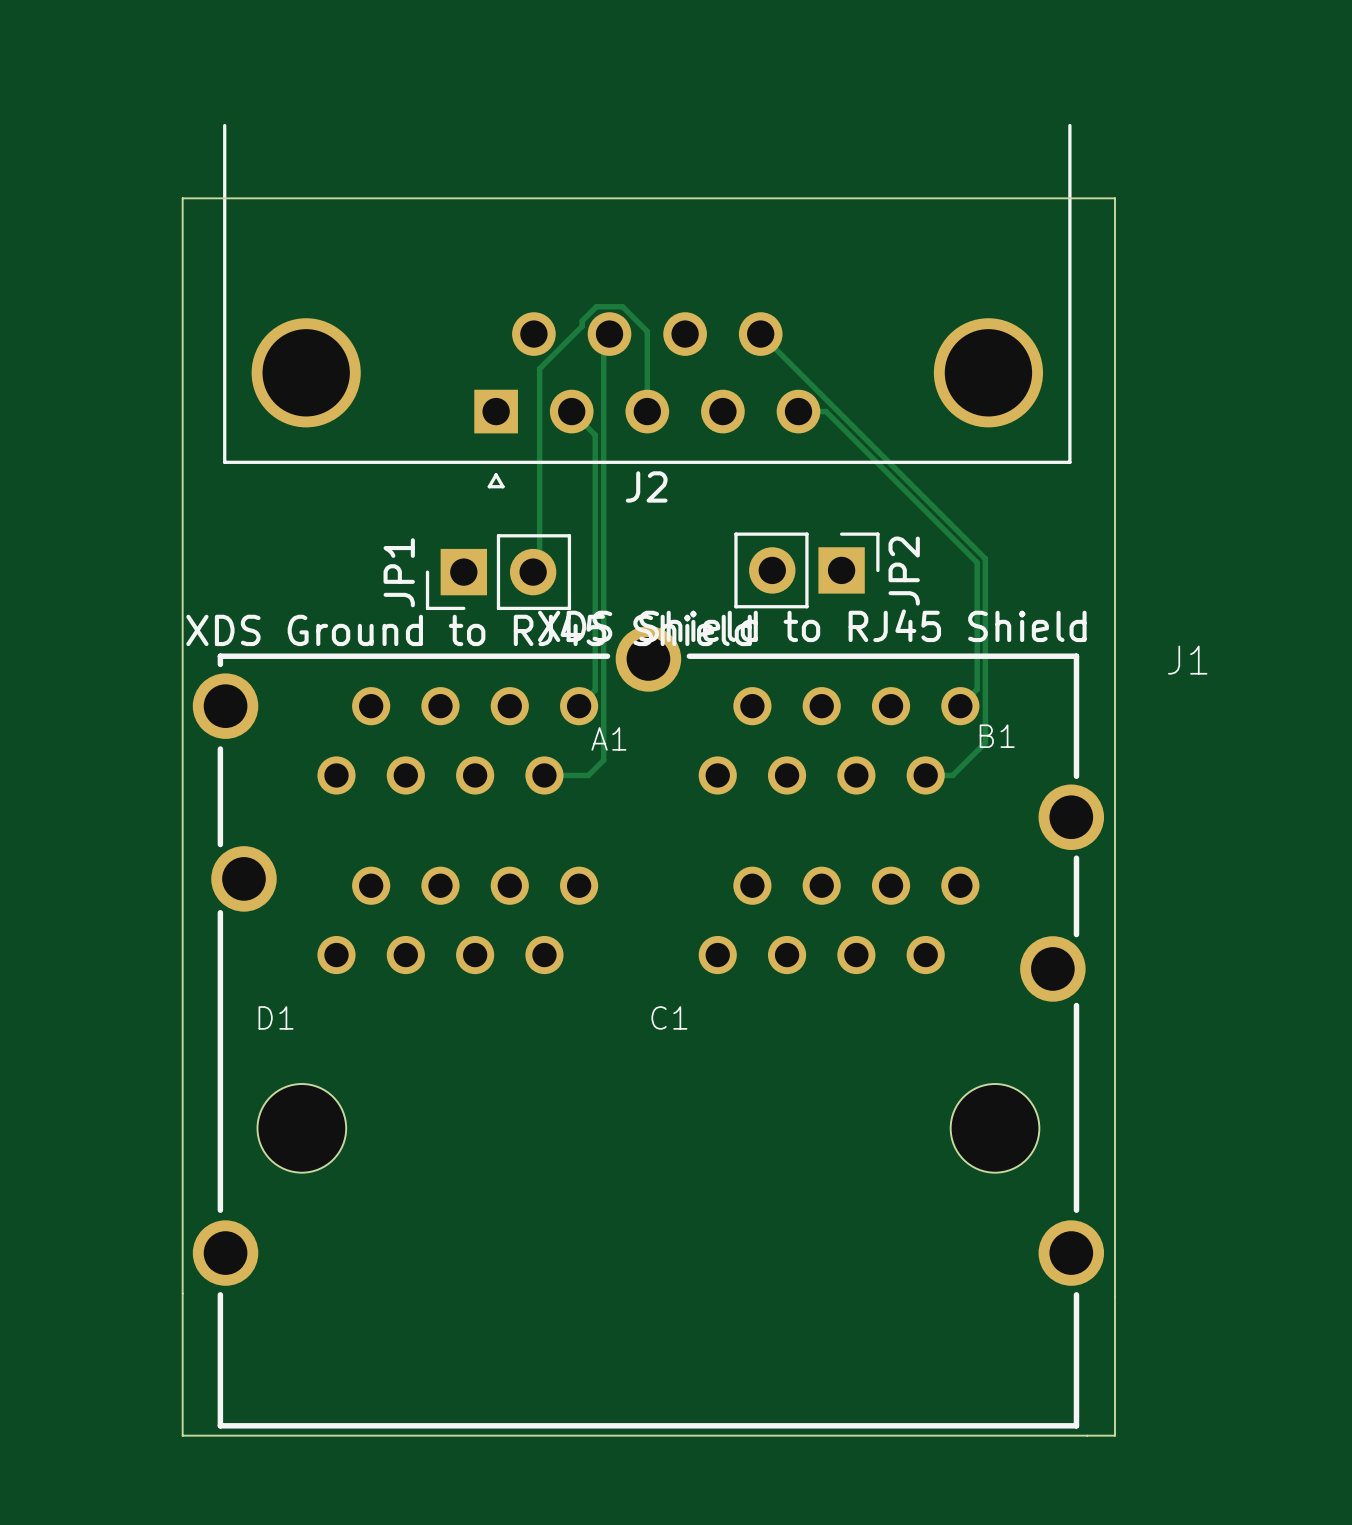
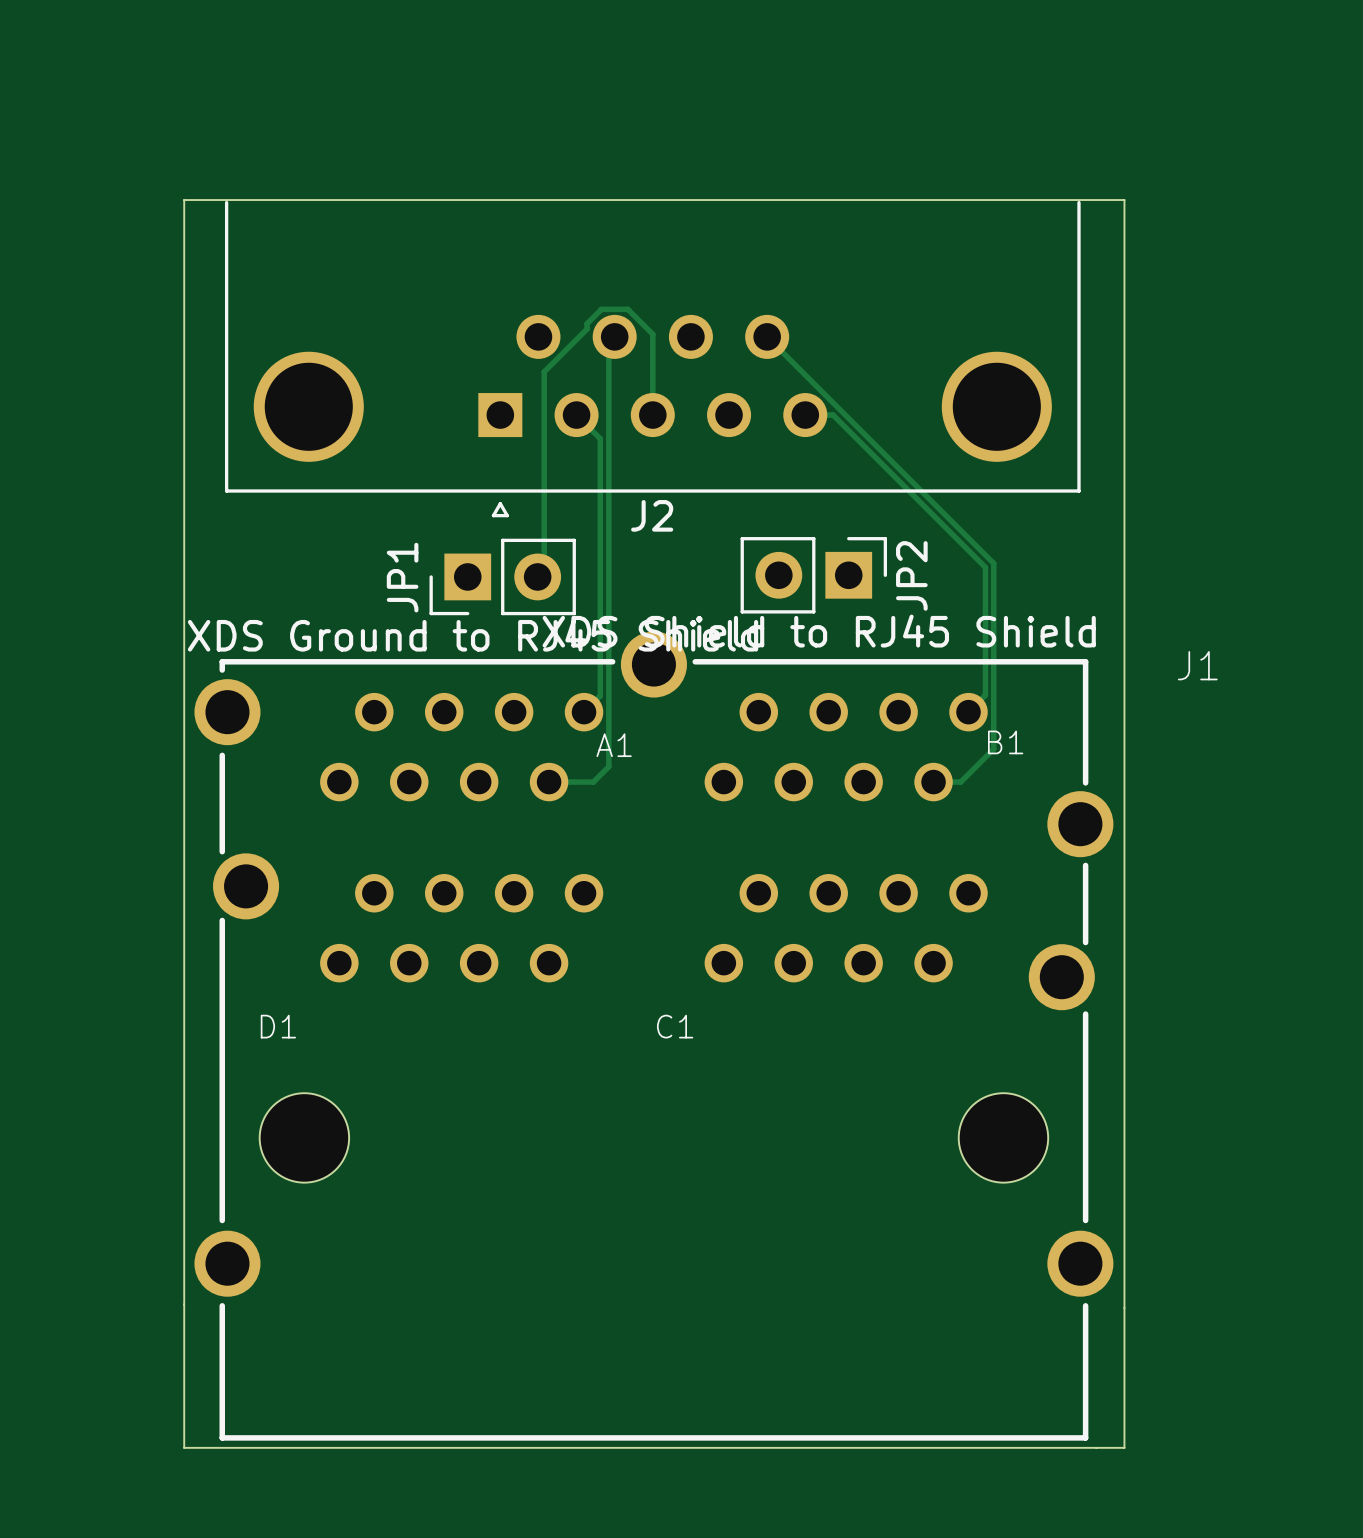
J2 footprint: [223, 123, 1072, 489] -> [224, 200, 1081, 518]

